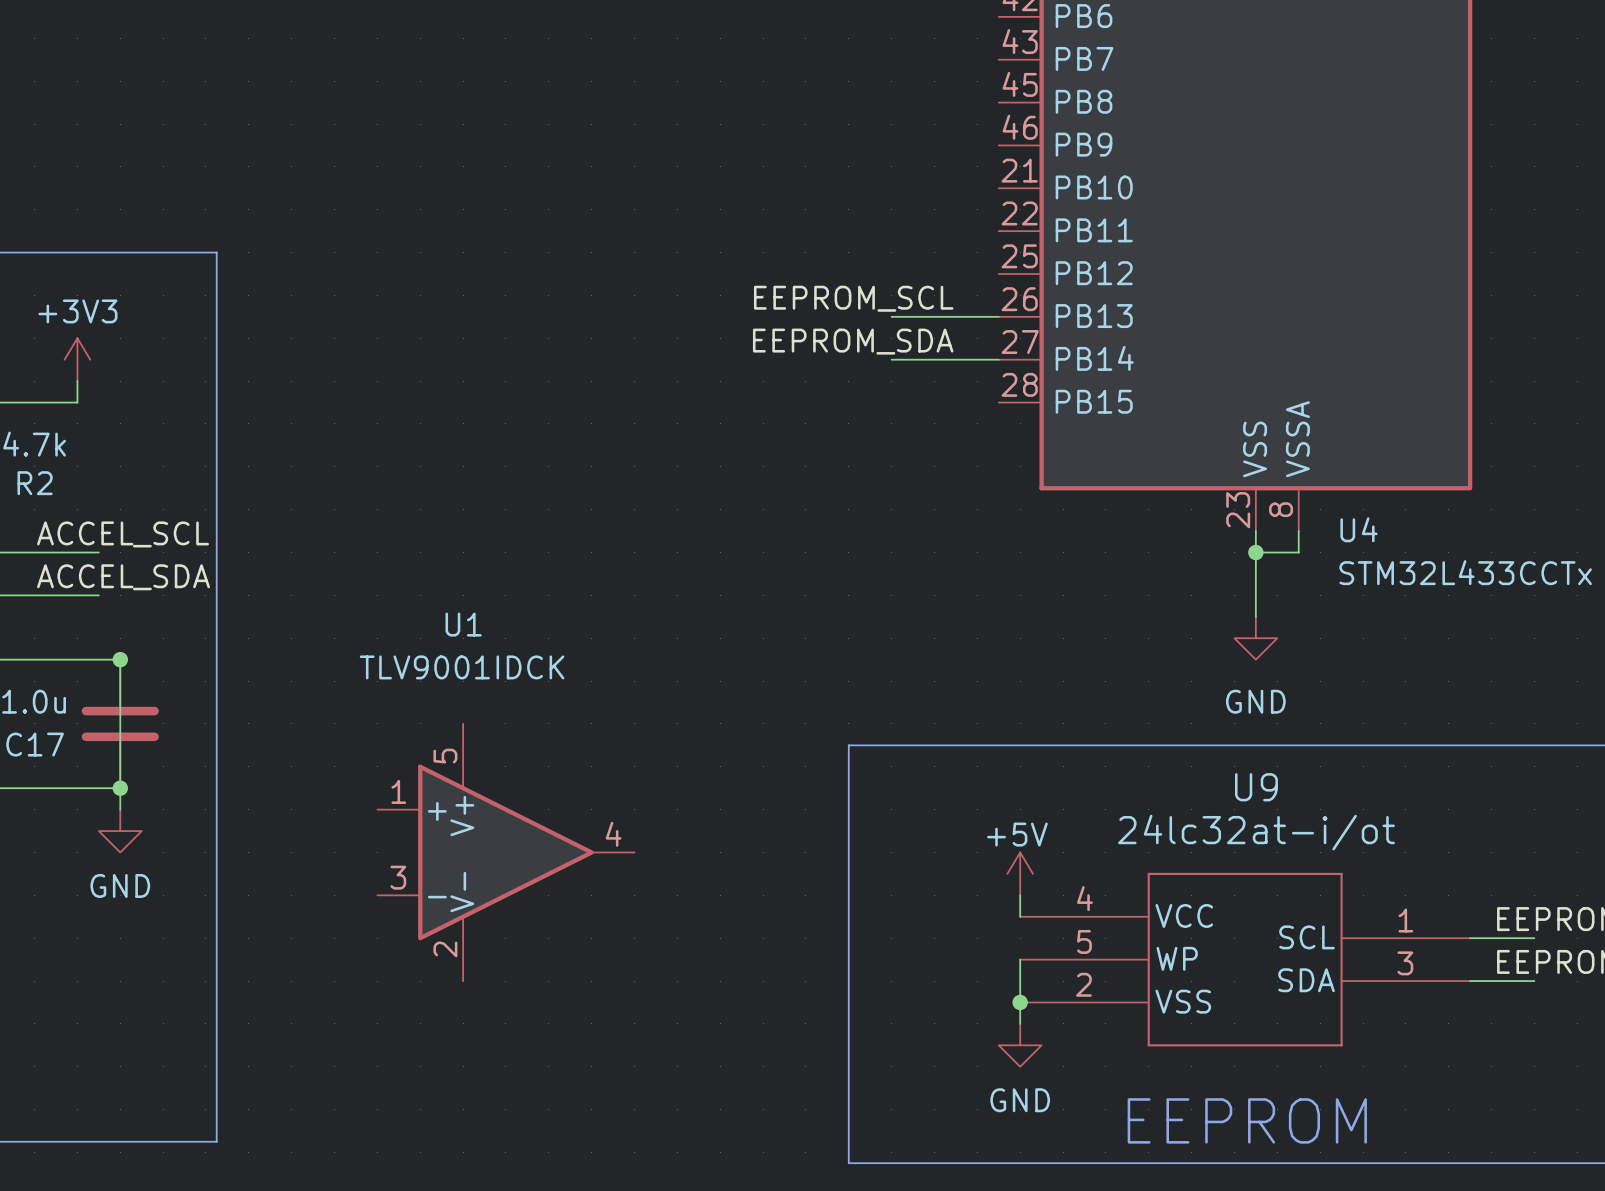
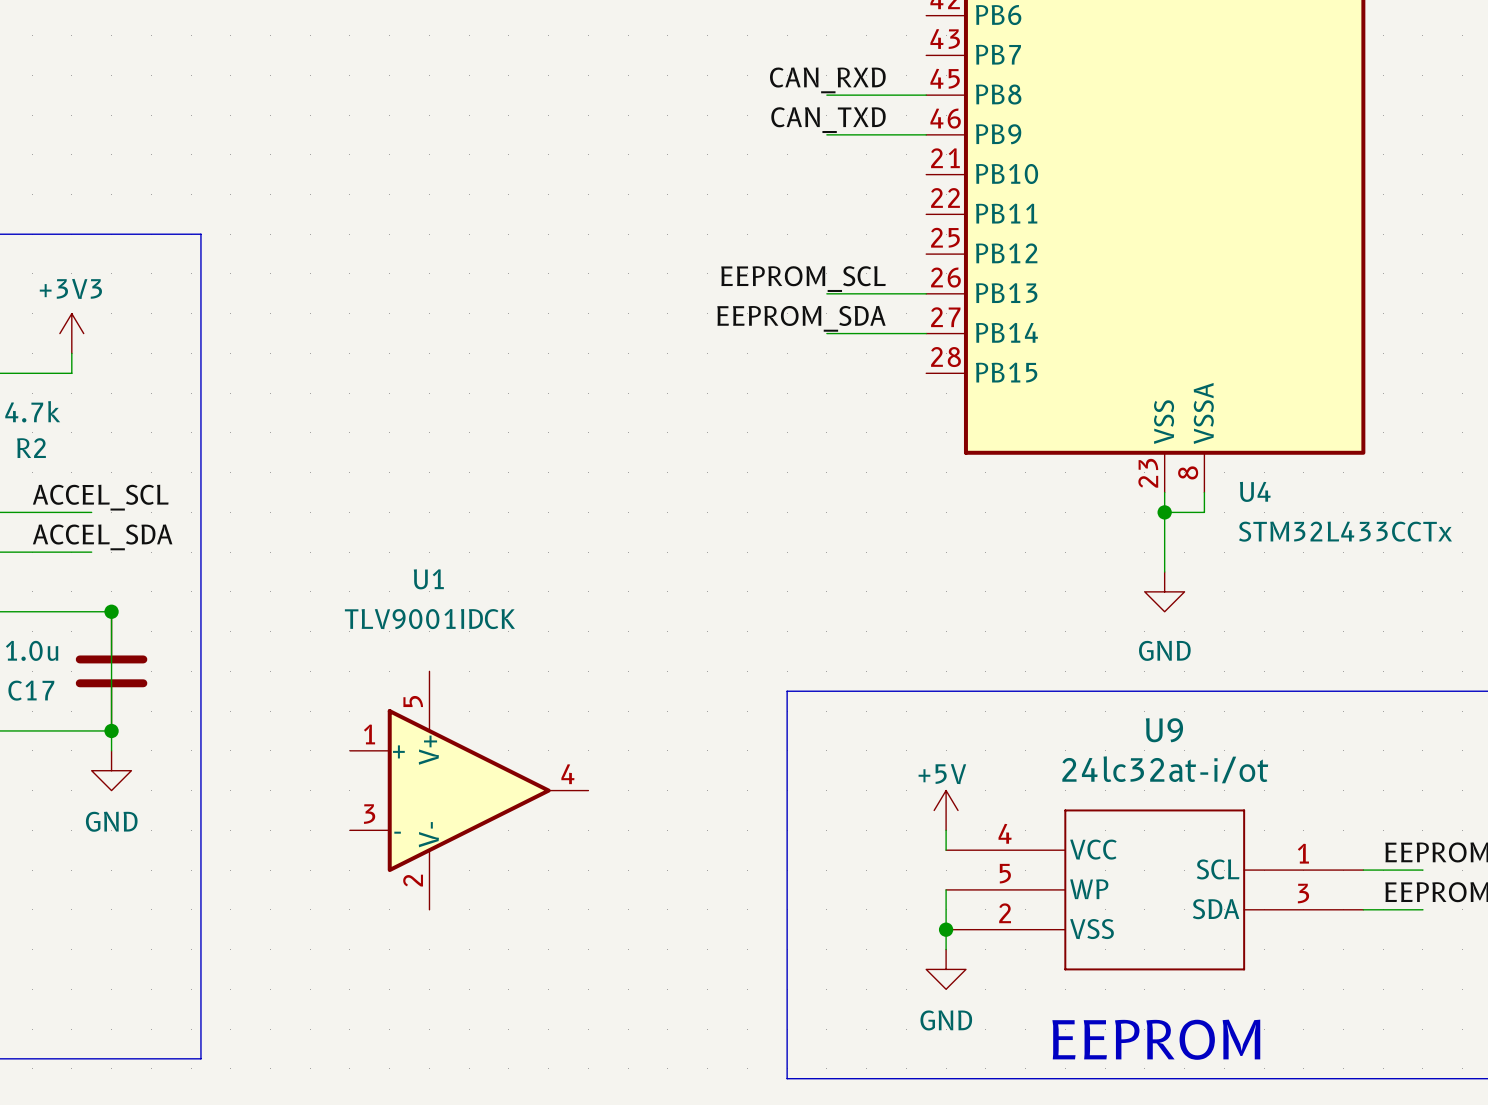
label: none -> CAN_RXD (827, 80)
wire: none -> (826, 95) (926, 95)
label: none -> CAN_TXD (828, 120)
wire: none -> (826, 134) (926, 134)

